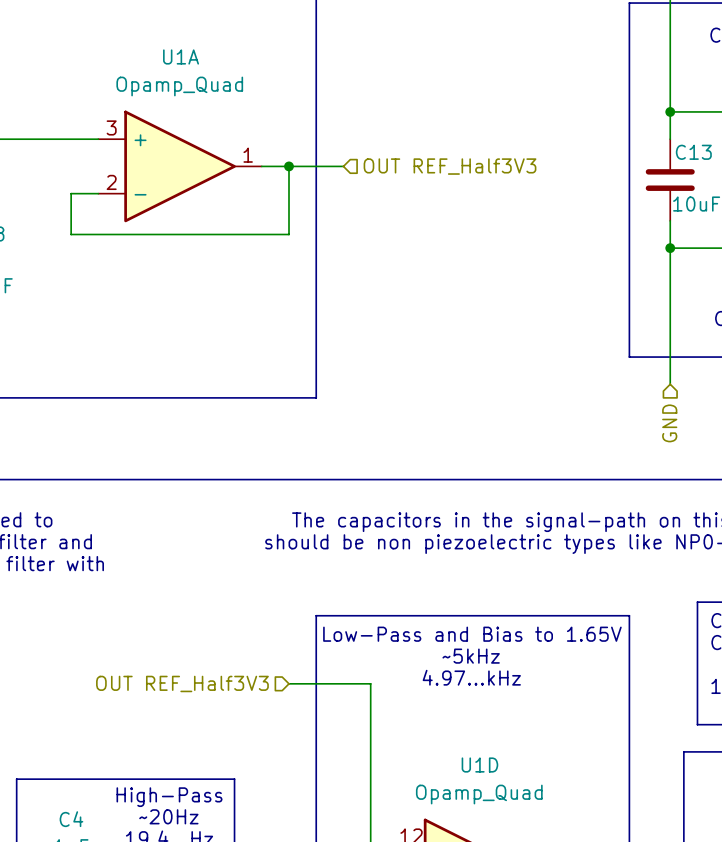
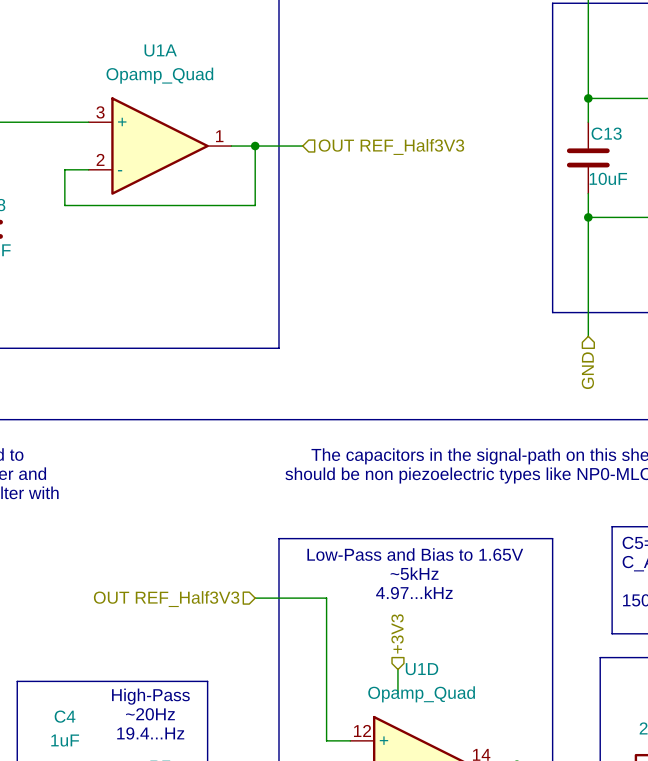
hierarchical label: none -> +3V3 (397, 633)
wire: none -> (397, 669) (397, 693)

